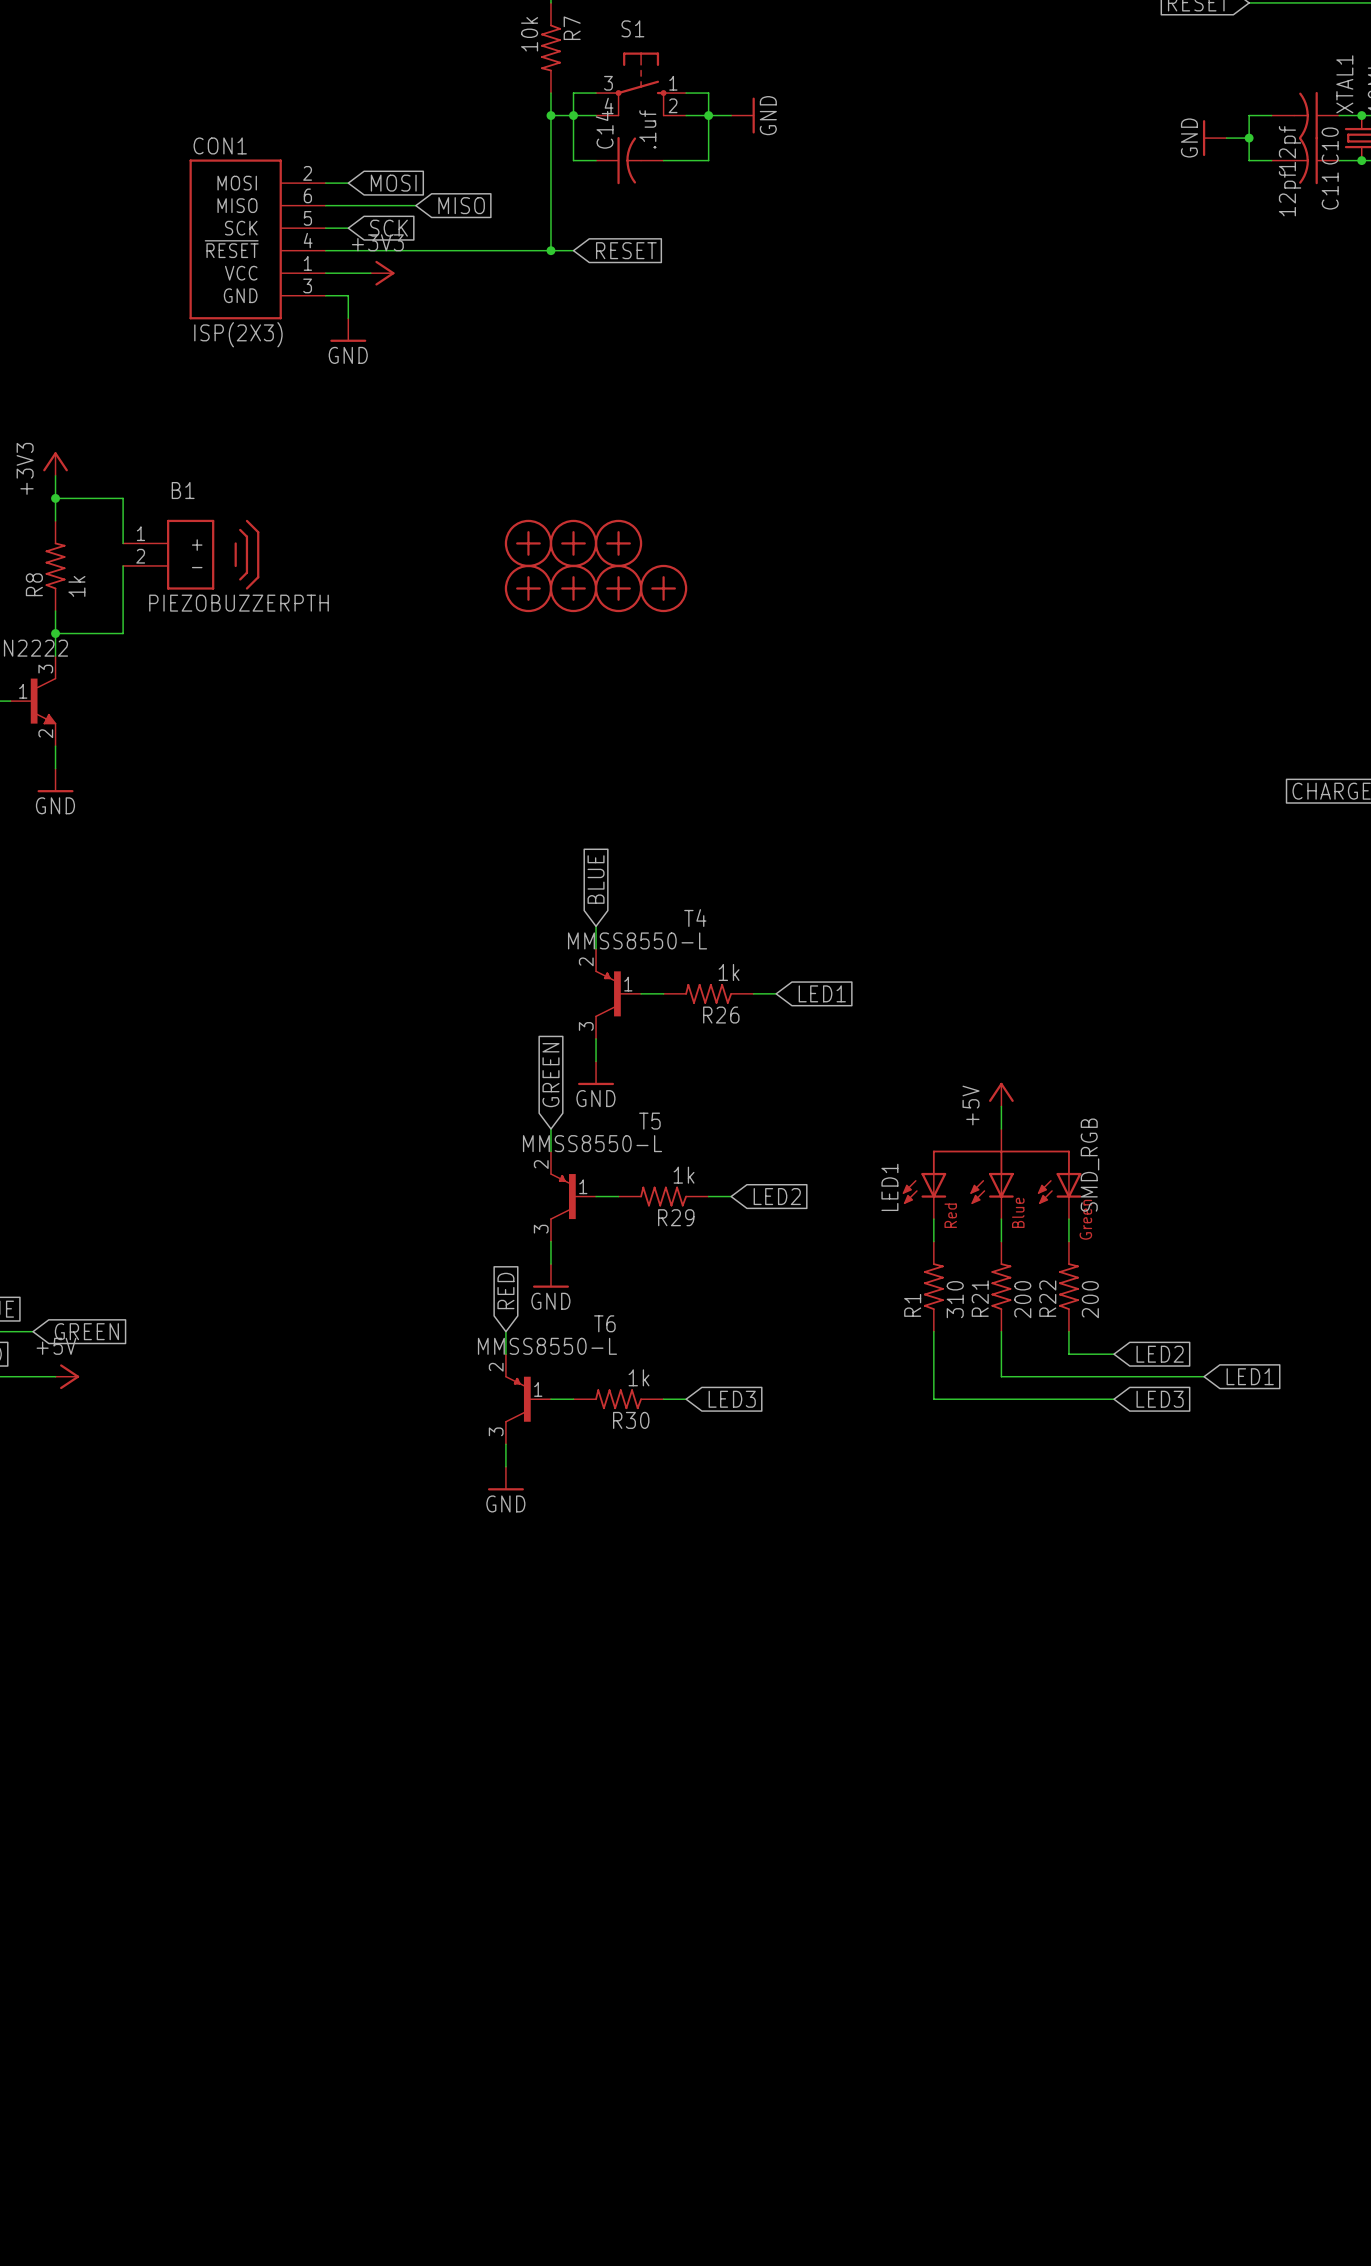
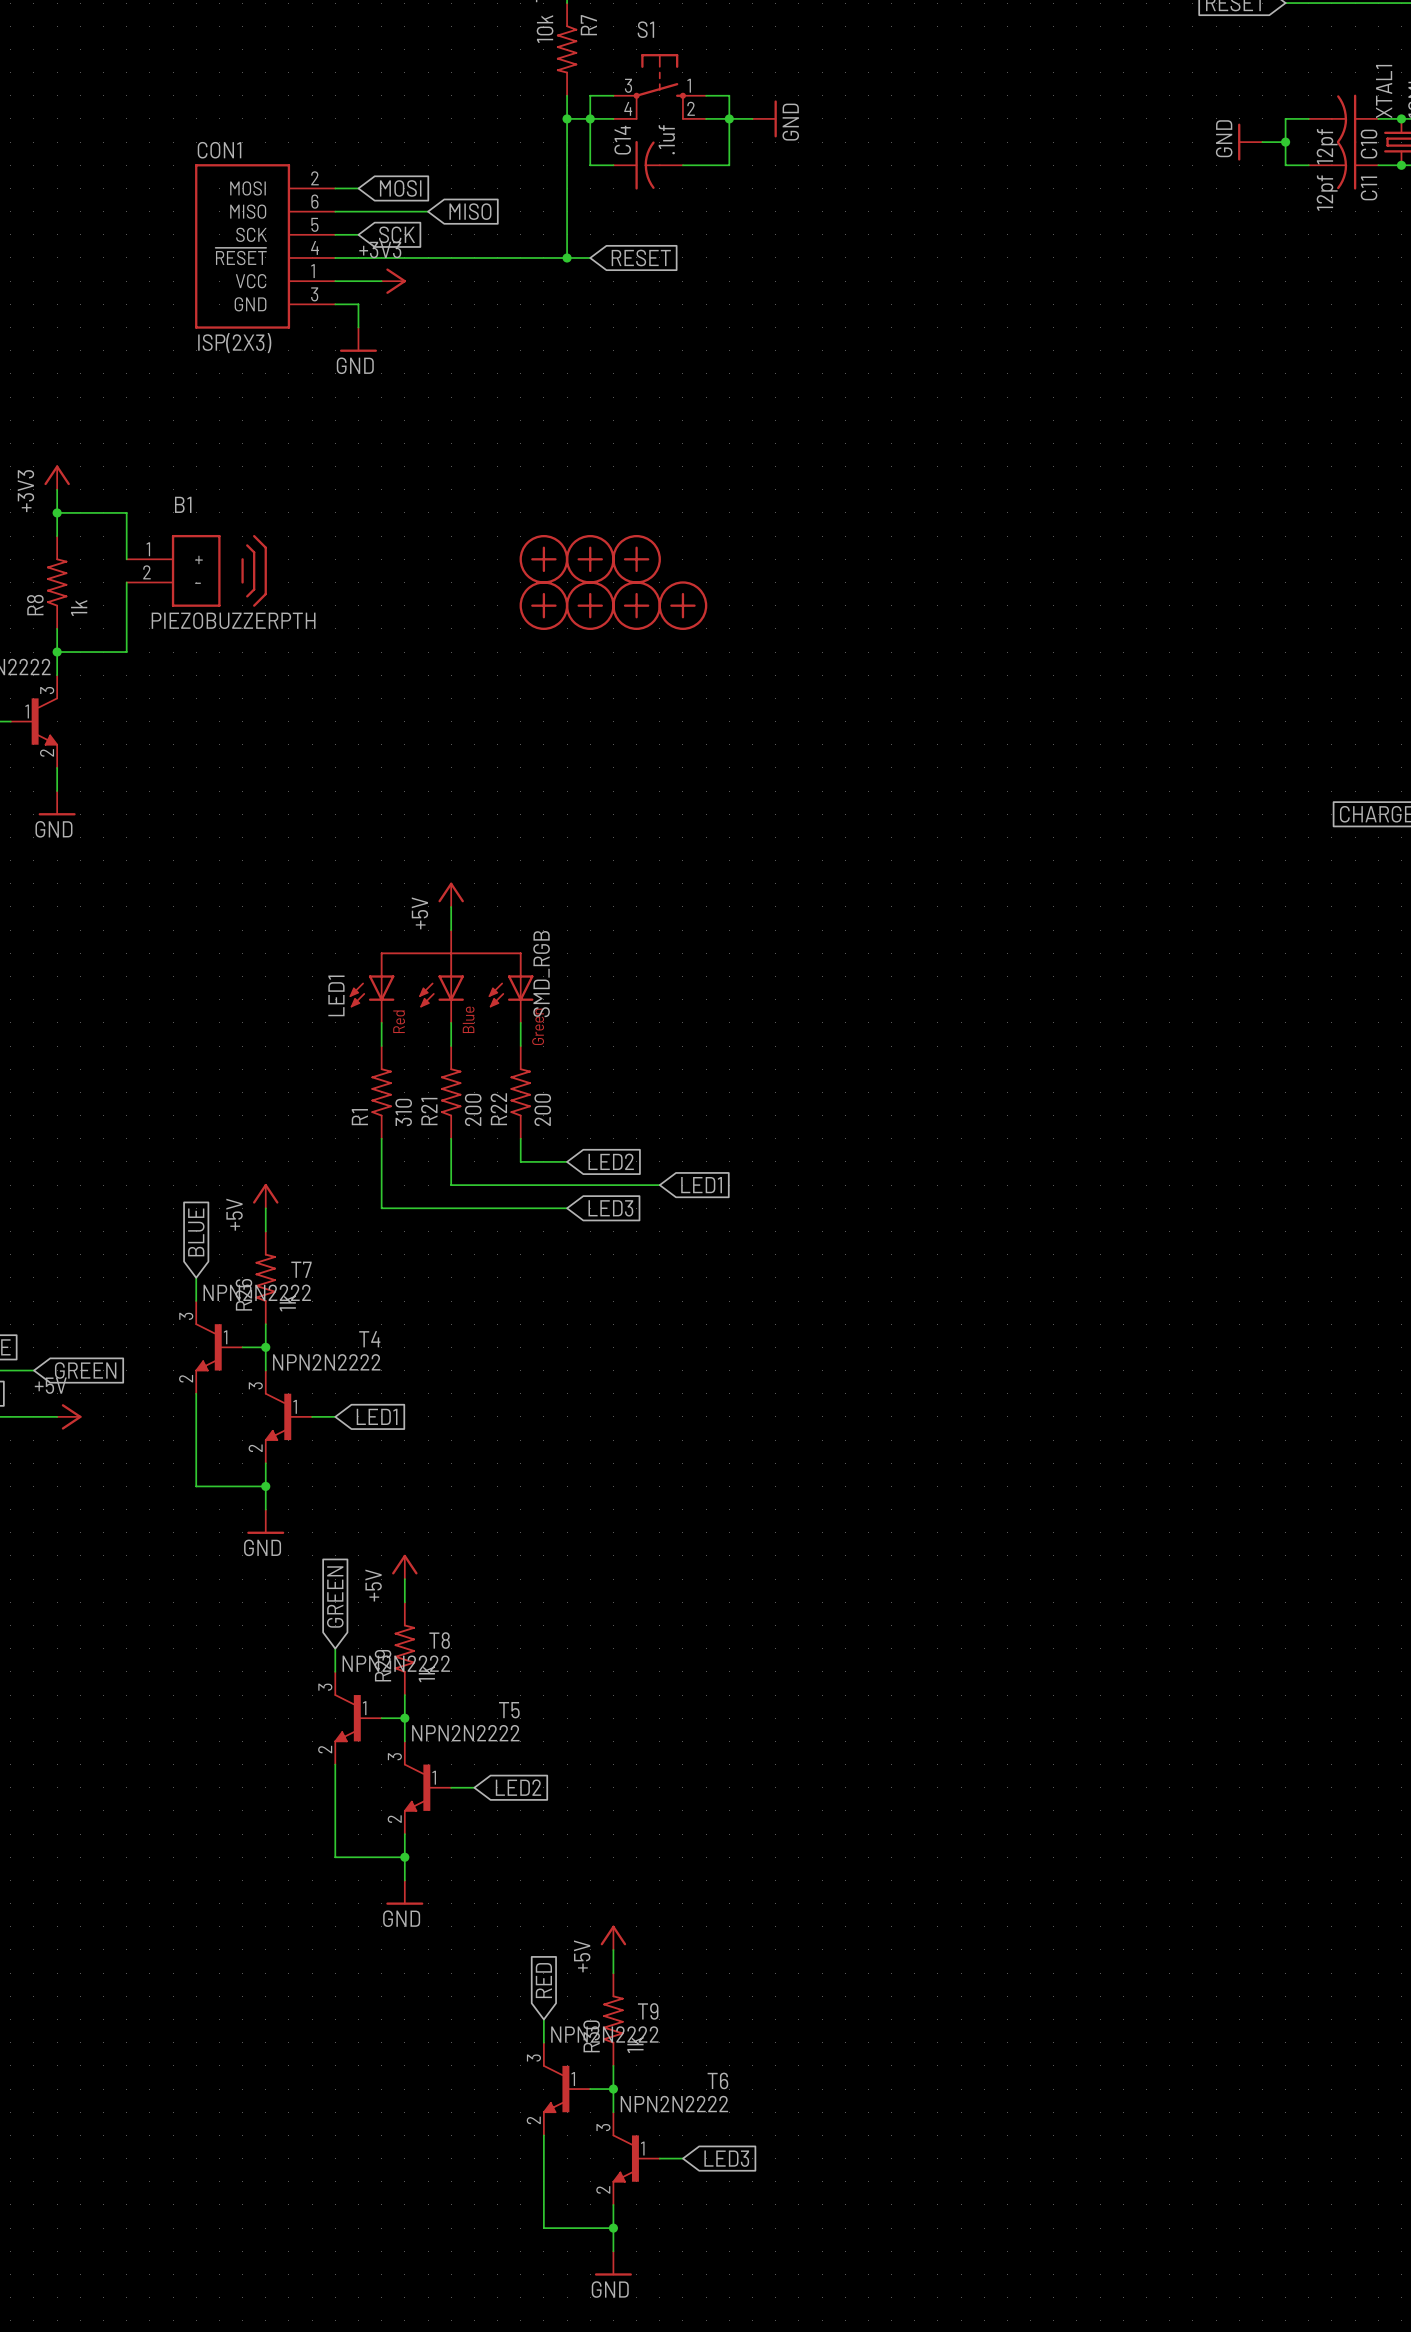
power symbol: none -> +5V (451, 894)
global label: BLUE (596, 879) -> none
wire: (596, 926) (596, 948) -> (451, 906) (451, 930)
T4 value: MMSS8550-L (637, 940) -> NPN2N2222 (326, 1362)
T4 symbol: [595, 948, 642, 1039] -> [265, 1370, 313, 1464]
wire: none -> (381, 1022) (381, 1046)
wire: none -> (520, 1022) (520, 1046)
wire: (641, 993) (663, 993) -> none
R26 rotation: 0° (708, 993) -> 90° clockwise (265, 1277)
R26 position: (708, 993) -> (265, 1277)
wire: (753, 993) (776, 993) -> none
global label position: LED1 (822, 993) -> LED1 (701, 1185)
wire: (596, 1038) (596, 1061) -> (451, 1022) (451, 1046)
power symbol: GND (596, 1073) -> none
global label: GREEN (550, 1075) -> LED2 (611, 1161)
power symbol: +5V (1001, 1094) -> none
wire: none -> (381, 1138) (381, 1208) (567, 1208)
wire: none -> (451, 1138) (451, 1185) (659, 1185)
wire: (1001, 1106) (1001, 1128) -> none
wire: (550, 1128) (550, 1151) -> (567, 1161) (520, 1161) (520, 1138)
T5 value: MMSS8550-L (592, 1143) -> NPN2N2222 (465, 1733)
T5 symbol: [550, 1151, 597, 1242] -> [404, 1741, 452, 1835]
power symbol: none -> +5V (265, 1196)
wire: none -> (265, 1208) (265, 1231)
global label: none -> LED3 (610, 1208)
LED1 position: (992, 1174) -> (441, 976)
global label: none -> BLUE (196, 1232)
wire: (596, 1196) (618, 1196) -> none
R29 rotation: 0° (663, 1196) -> 90° clockwise (404, 1648)
R29 position: (663, 1196) -> (404, 1648)
wire: (708, 1196) (731, 1196) -> none
global label: LED2 (777, 1196) -> none
wire: (933, 1219) (933, 1241) -> none
wire: (1001, 1219) (1001, 1241) -> none
wire: (1068, 1219) (1068, 1241) -> none
wire: none -> (196, 1277) (196, 1301)
wire: (550, 1241) (550, 1264) -> none
power symbol: GND (550, 1275) -> none
wire: none -> (265, 1324) (265, 1370)
R1 position: (933, 1286) -> (381, 1092)
R21 position: (1001, 1286) -> (451, 1092)
R22 position: (1068, 1286) -> (520, 1092)
global label: RED (505, 1290) -> none
T7: none -> NPN2N2222 (219, 1347)
wire: none -> (242, 1347) (265, 1347)
junction: none -> (265, 1347)
wire: (505, 1331) (505, 1354) -> none
wire: (933, 1331) (933, 1399) (1114, 1399) -> none
wire: (1001, 1331) (1001, 1376) (1204, 1376) -> none
wire: (1068, 1331) (1068, 1354) (1114, 1354) -> none
T6 value: MMSS8550-L (547, 1346) -> NPN2N2222 (674, 2104)
wire: none -> (196, 1393) (196, 1486) (265, 1486)
T6 symbol: [505, 1354, 551, 1445] -> [612, 2112, 660, 2205]
global label: LED2 (1160, 1354) -> none
wire: none -> (312, 1416) (335, 1416)
global label: none -> LED1 (377, 1416)
global label: LED1 (1250, 1376) -> none
wire: (550, 1399) (573, 1399) -> none
R30 rotation: 0° (618, 1399) -> 90° clockwise (613, 2019)
R30 position: (618, 1399) -> (613, 2019)
wire: (663, 1399) (686, 1399) -> none
global label: LED3 (732, 1399) -> none
global label: LED3 (1160, 1399) -> none
wire: none -> (265, 1463) (265, 1509)
junction: none -> (265, 1486)
wire: (505, 1444) (505, 1466) -> (404, 1579) (404, 1602)
power symbol: none -> GND (265, 1521)
power symbol: GND (505, 1478) -> none
power symbol: none -> +5V (404, 1566)
global label: none -> GREEN (335, 1596)
wire: none -> (335, 1648) (335, 1671)
wire: none -> (404, 1695) (404, 1741)
T8: none -> NPN2N2222 (358, 1718)
wire: none -> (381, 1718) (404, 1718)
junction: none -> (404, 1718)
wire: none -> (335, 1764) (335, 1857) (404, 1857)
wire: none -> (451, 1787) (474, 1787)
global label: none -> LED2 (518, 1787)
wire: none -> (404, 1834) (404, 1880)
junction: none -> (404, 1857)
power symbol: none -> GND (404, 1892)
power symbol: none -> +5V (613, 1937)
wire: none -> (613, 1949) (613, 1973)
global label: none -> RED (543, 1980)
wire: none -> (543, 2019) (543, 2042)
wire: none -> (613, 2065) (613, 2112)
T9: none -> NPN2N2222 (566, 2089)
wire: none -> (590, 2089) (613, 2089)
junction: none -> (613, 2089)
wire: none -> (543, 2135) (543, 2228) (613, 2228)
wire: none -> (659, 2158) (682, 2158)
global label: none -> LED3 (726, 2158)
wire: none -> (613, 2204) (613, 2251)
junction: none -> (613, 2228)
power symbol: none -> GND (613, 2263)

